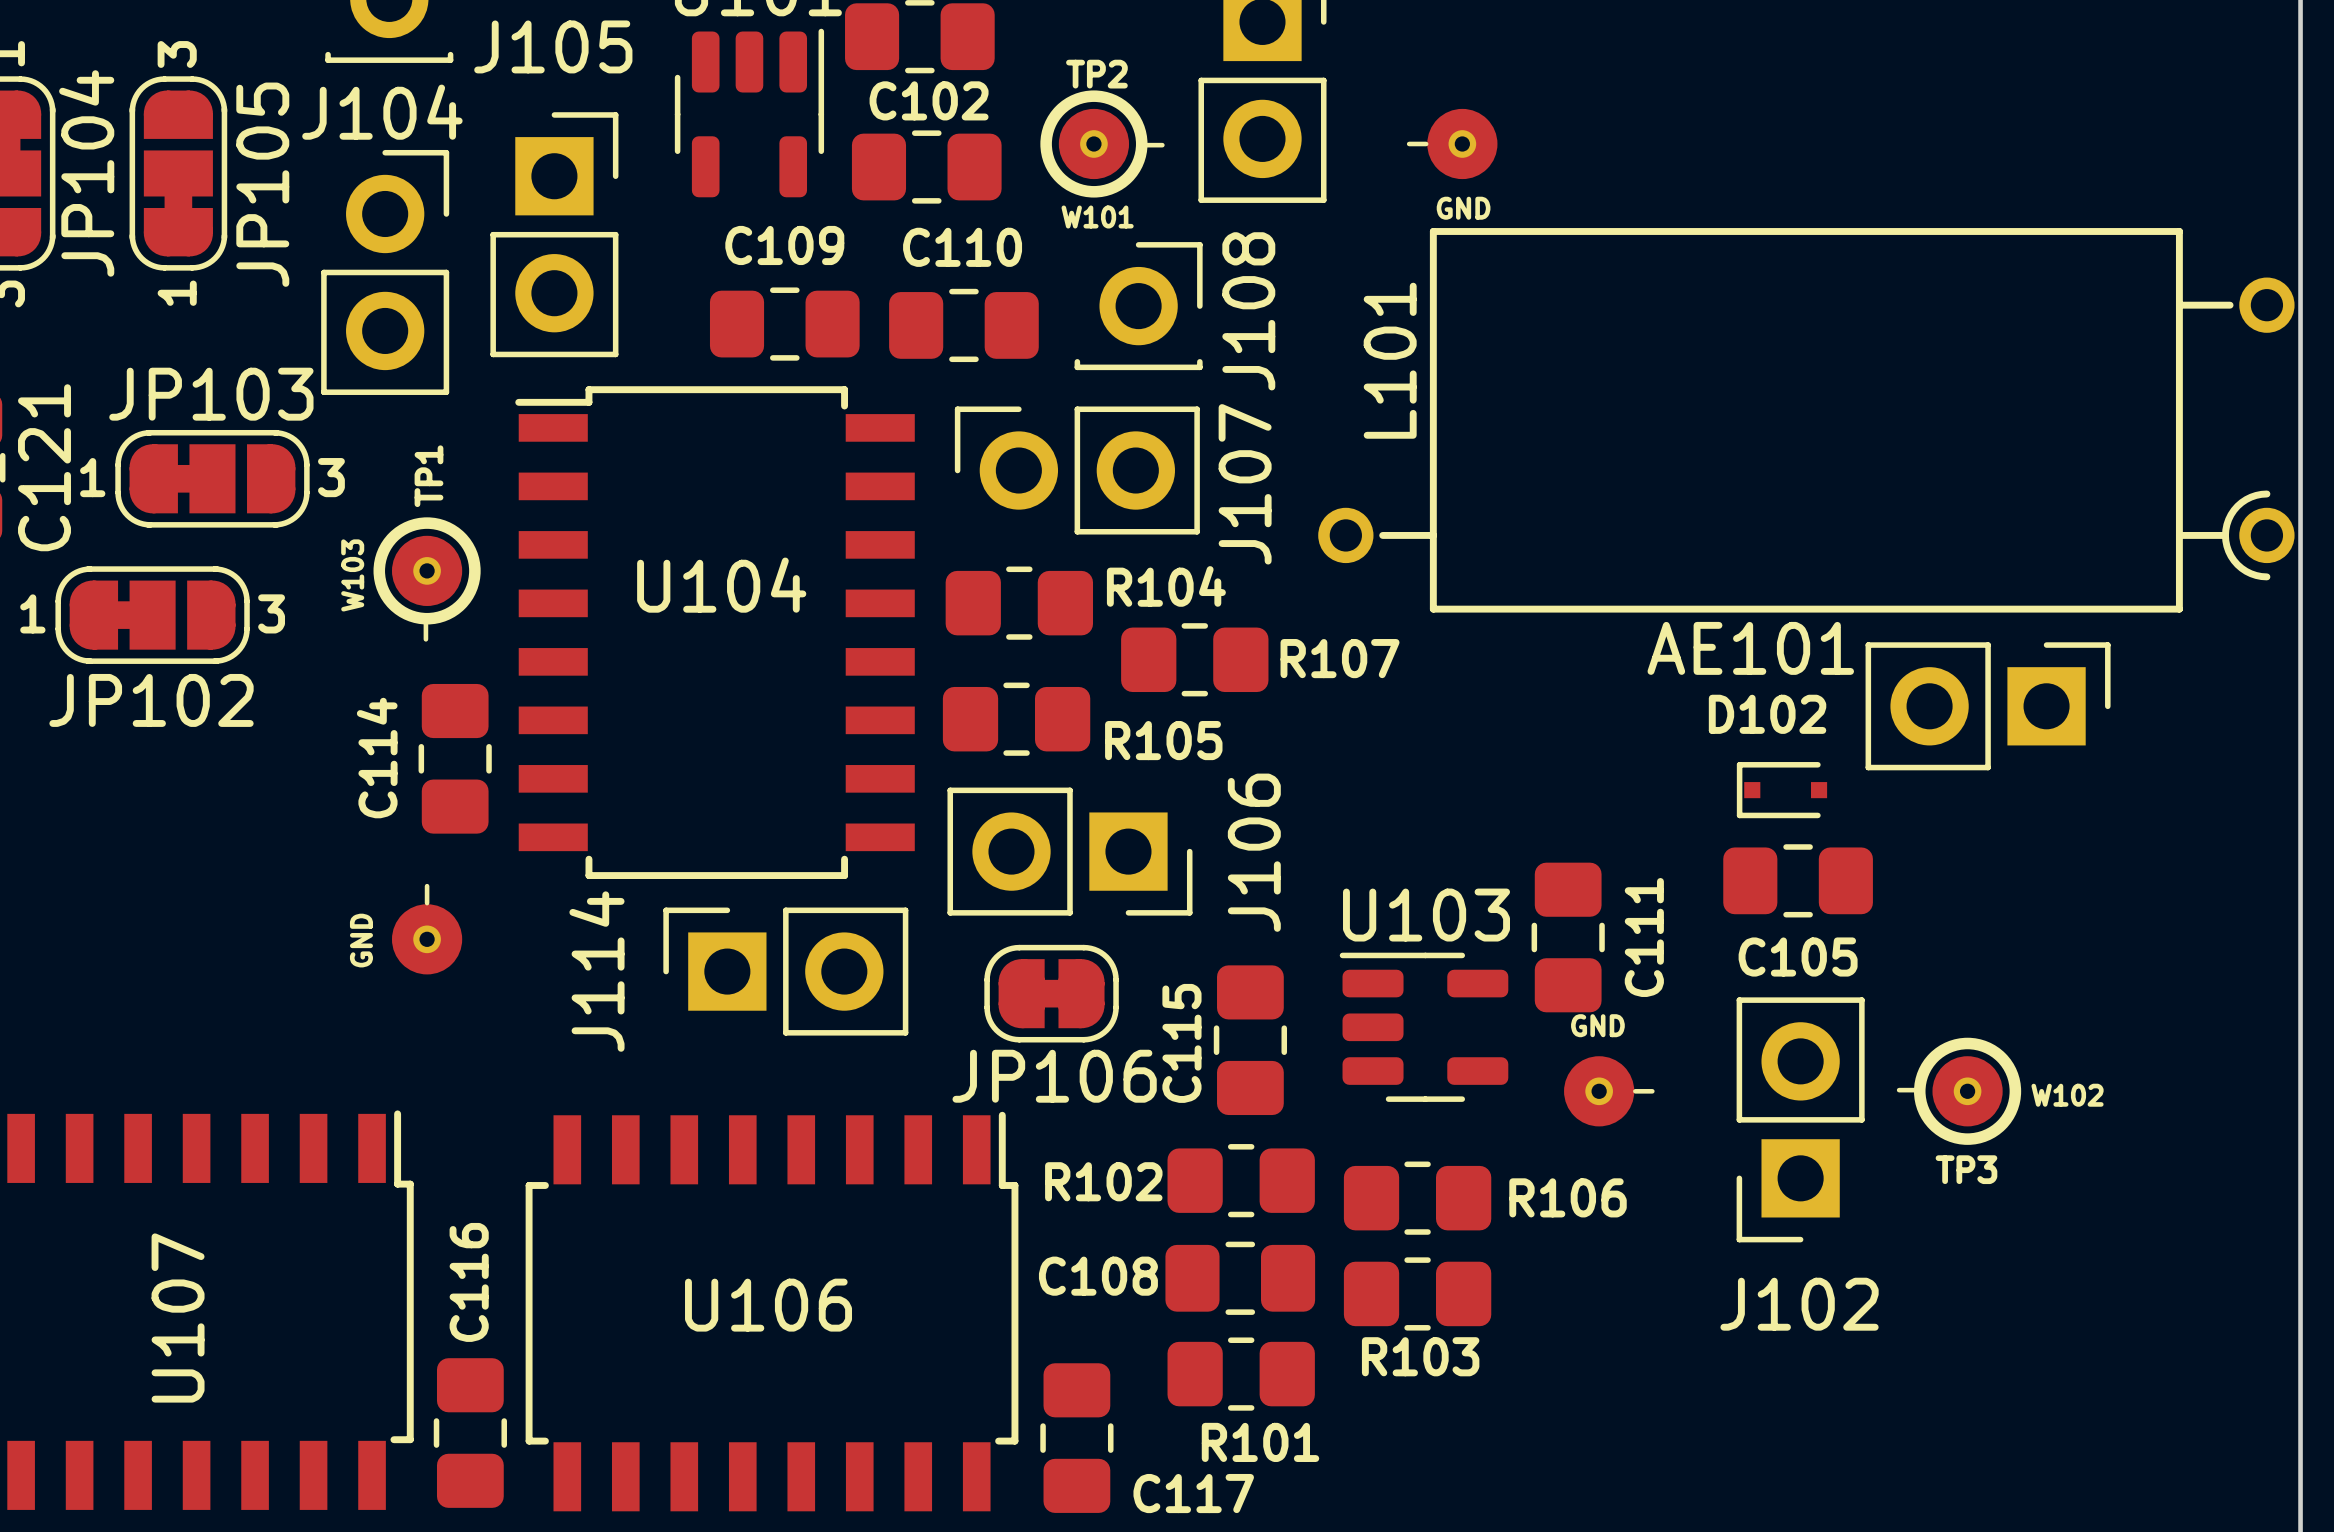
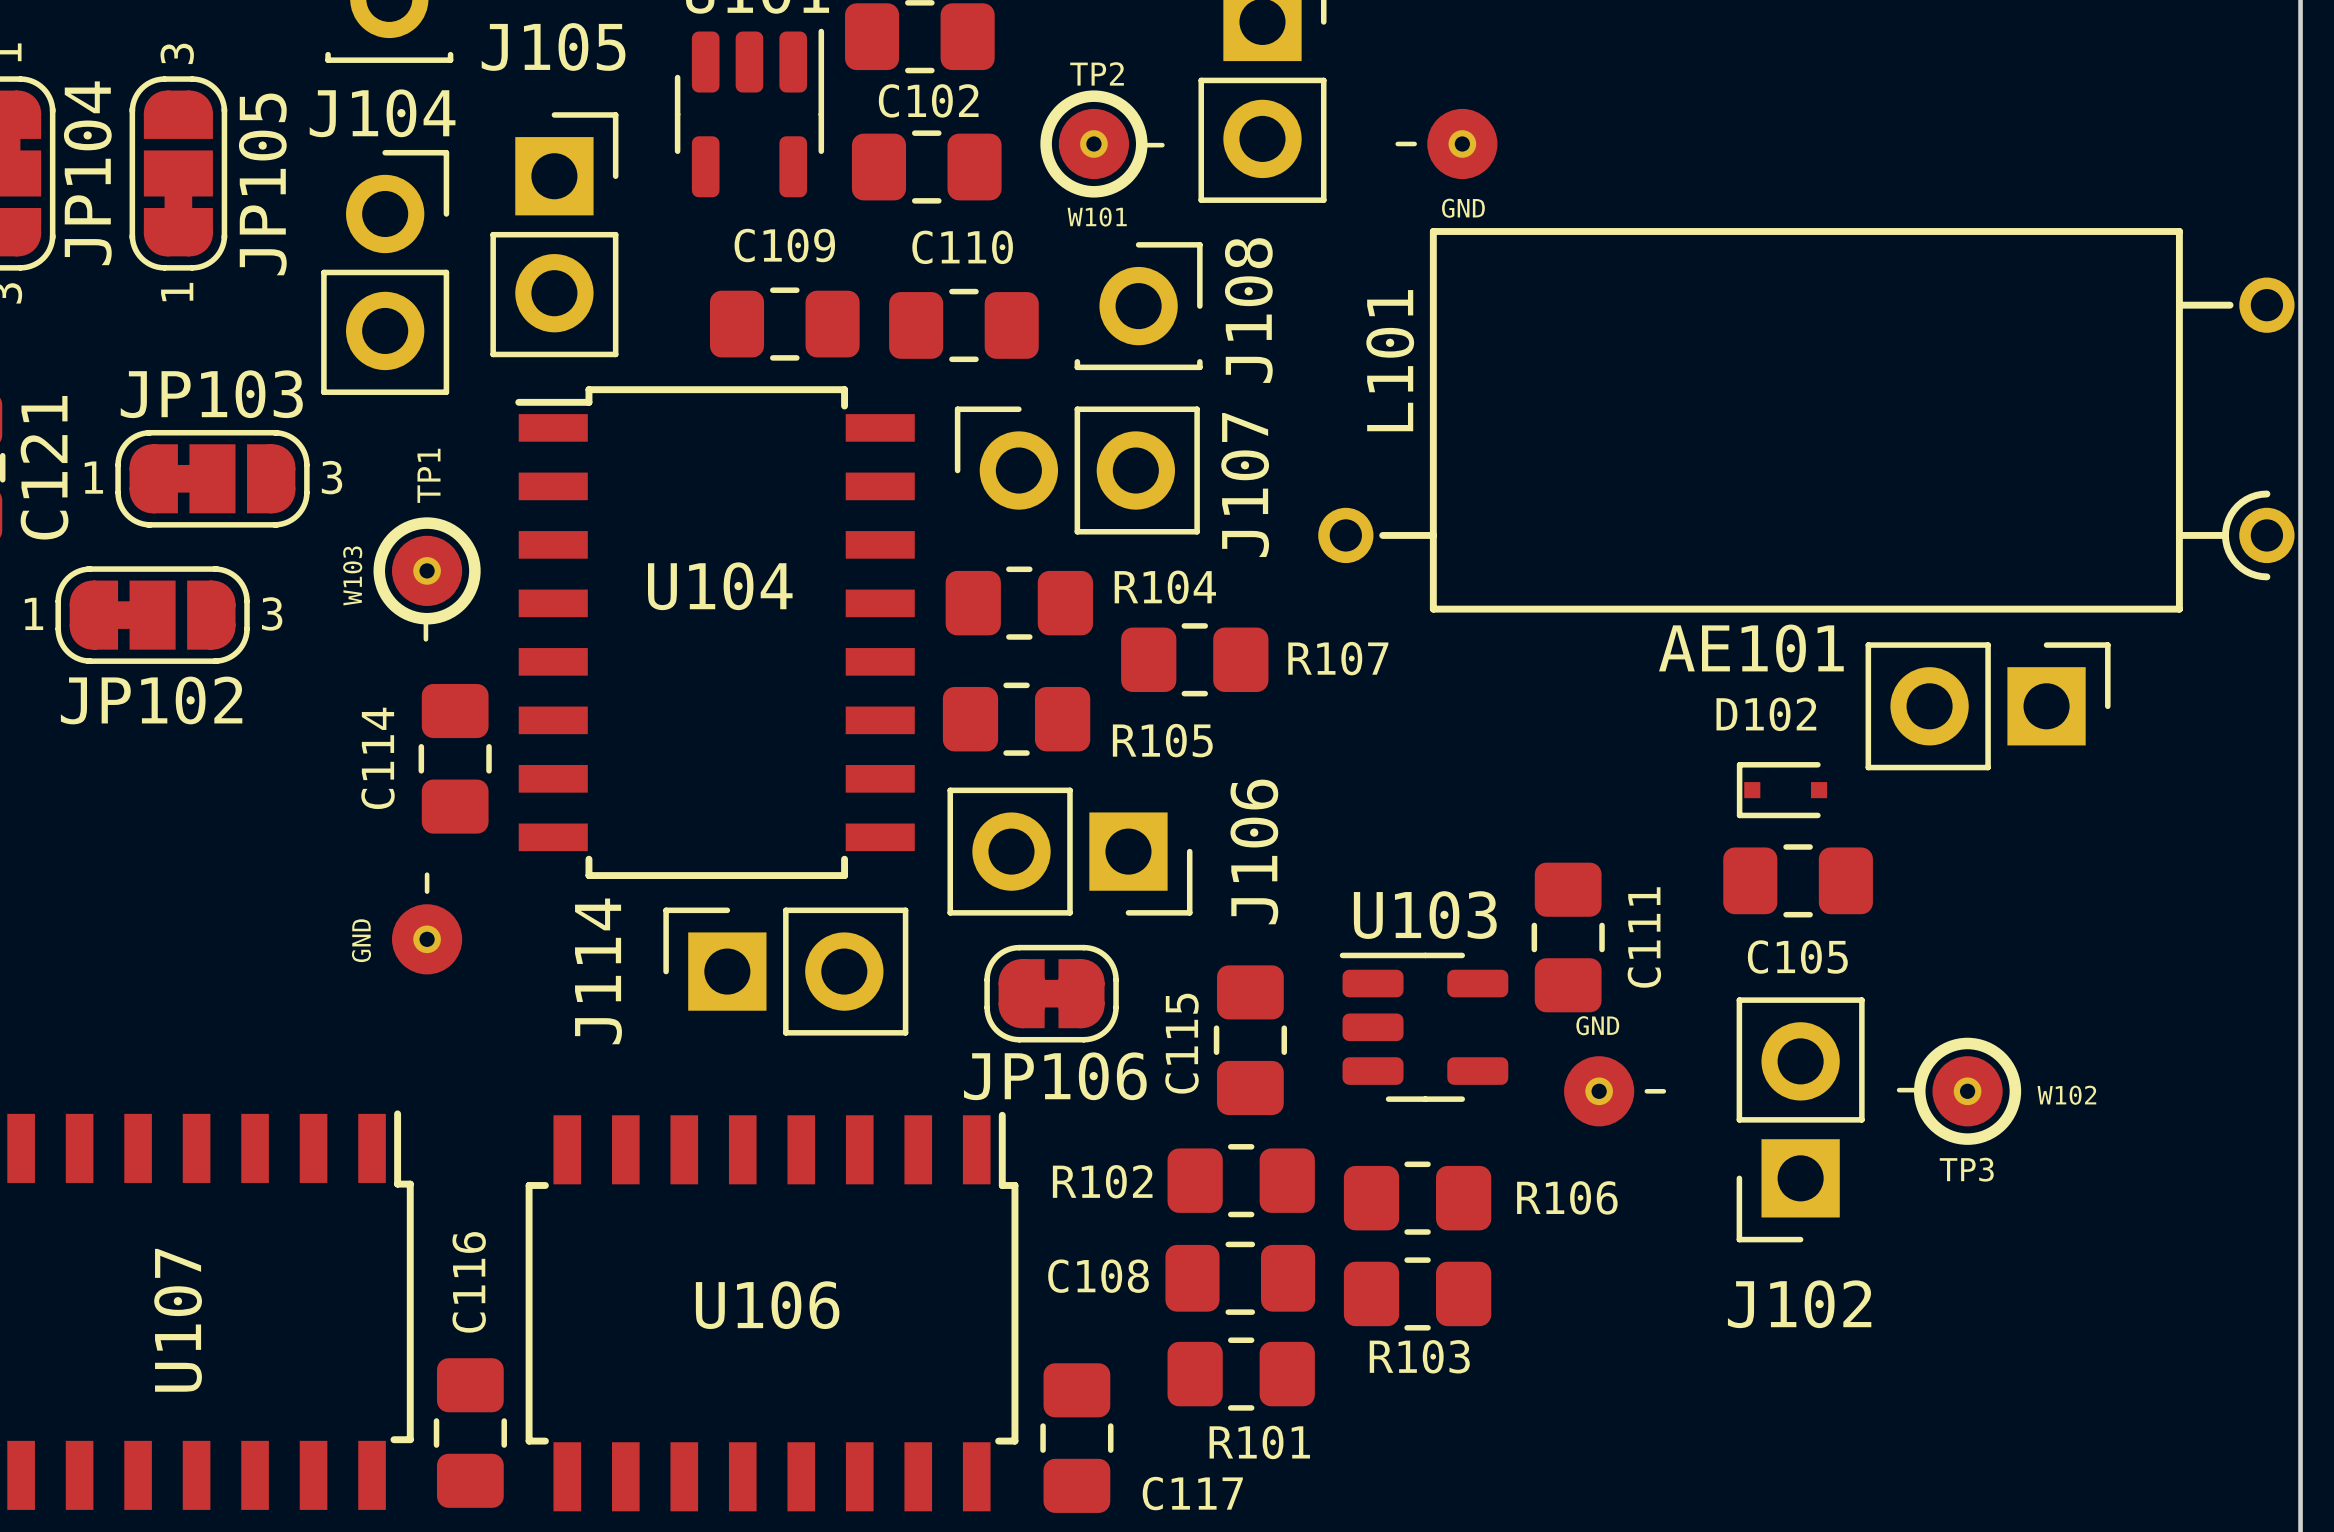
W101 footprint: [1040, 90, 1498, 198] -> [1040, 90, 1498, 198]
W103 footprint: [373, 517, 481, 975] -> [373, 517, 481, 975]
W102 footprint: [1564, 1037, 2022, 1145] -> [1564, 1037, 2022, 1145]

